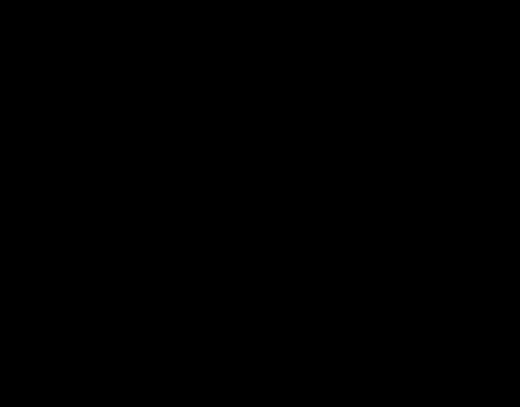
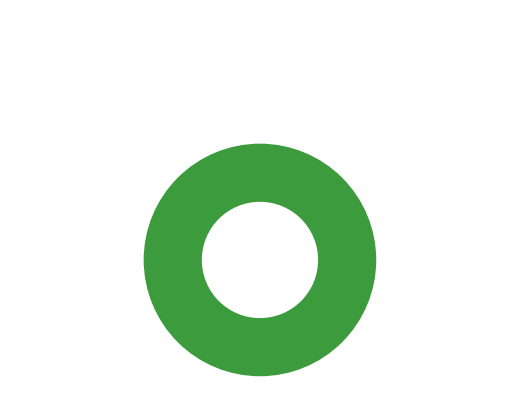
part: none -> (259, 259)

